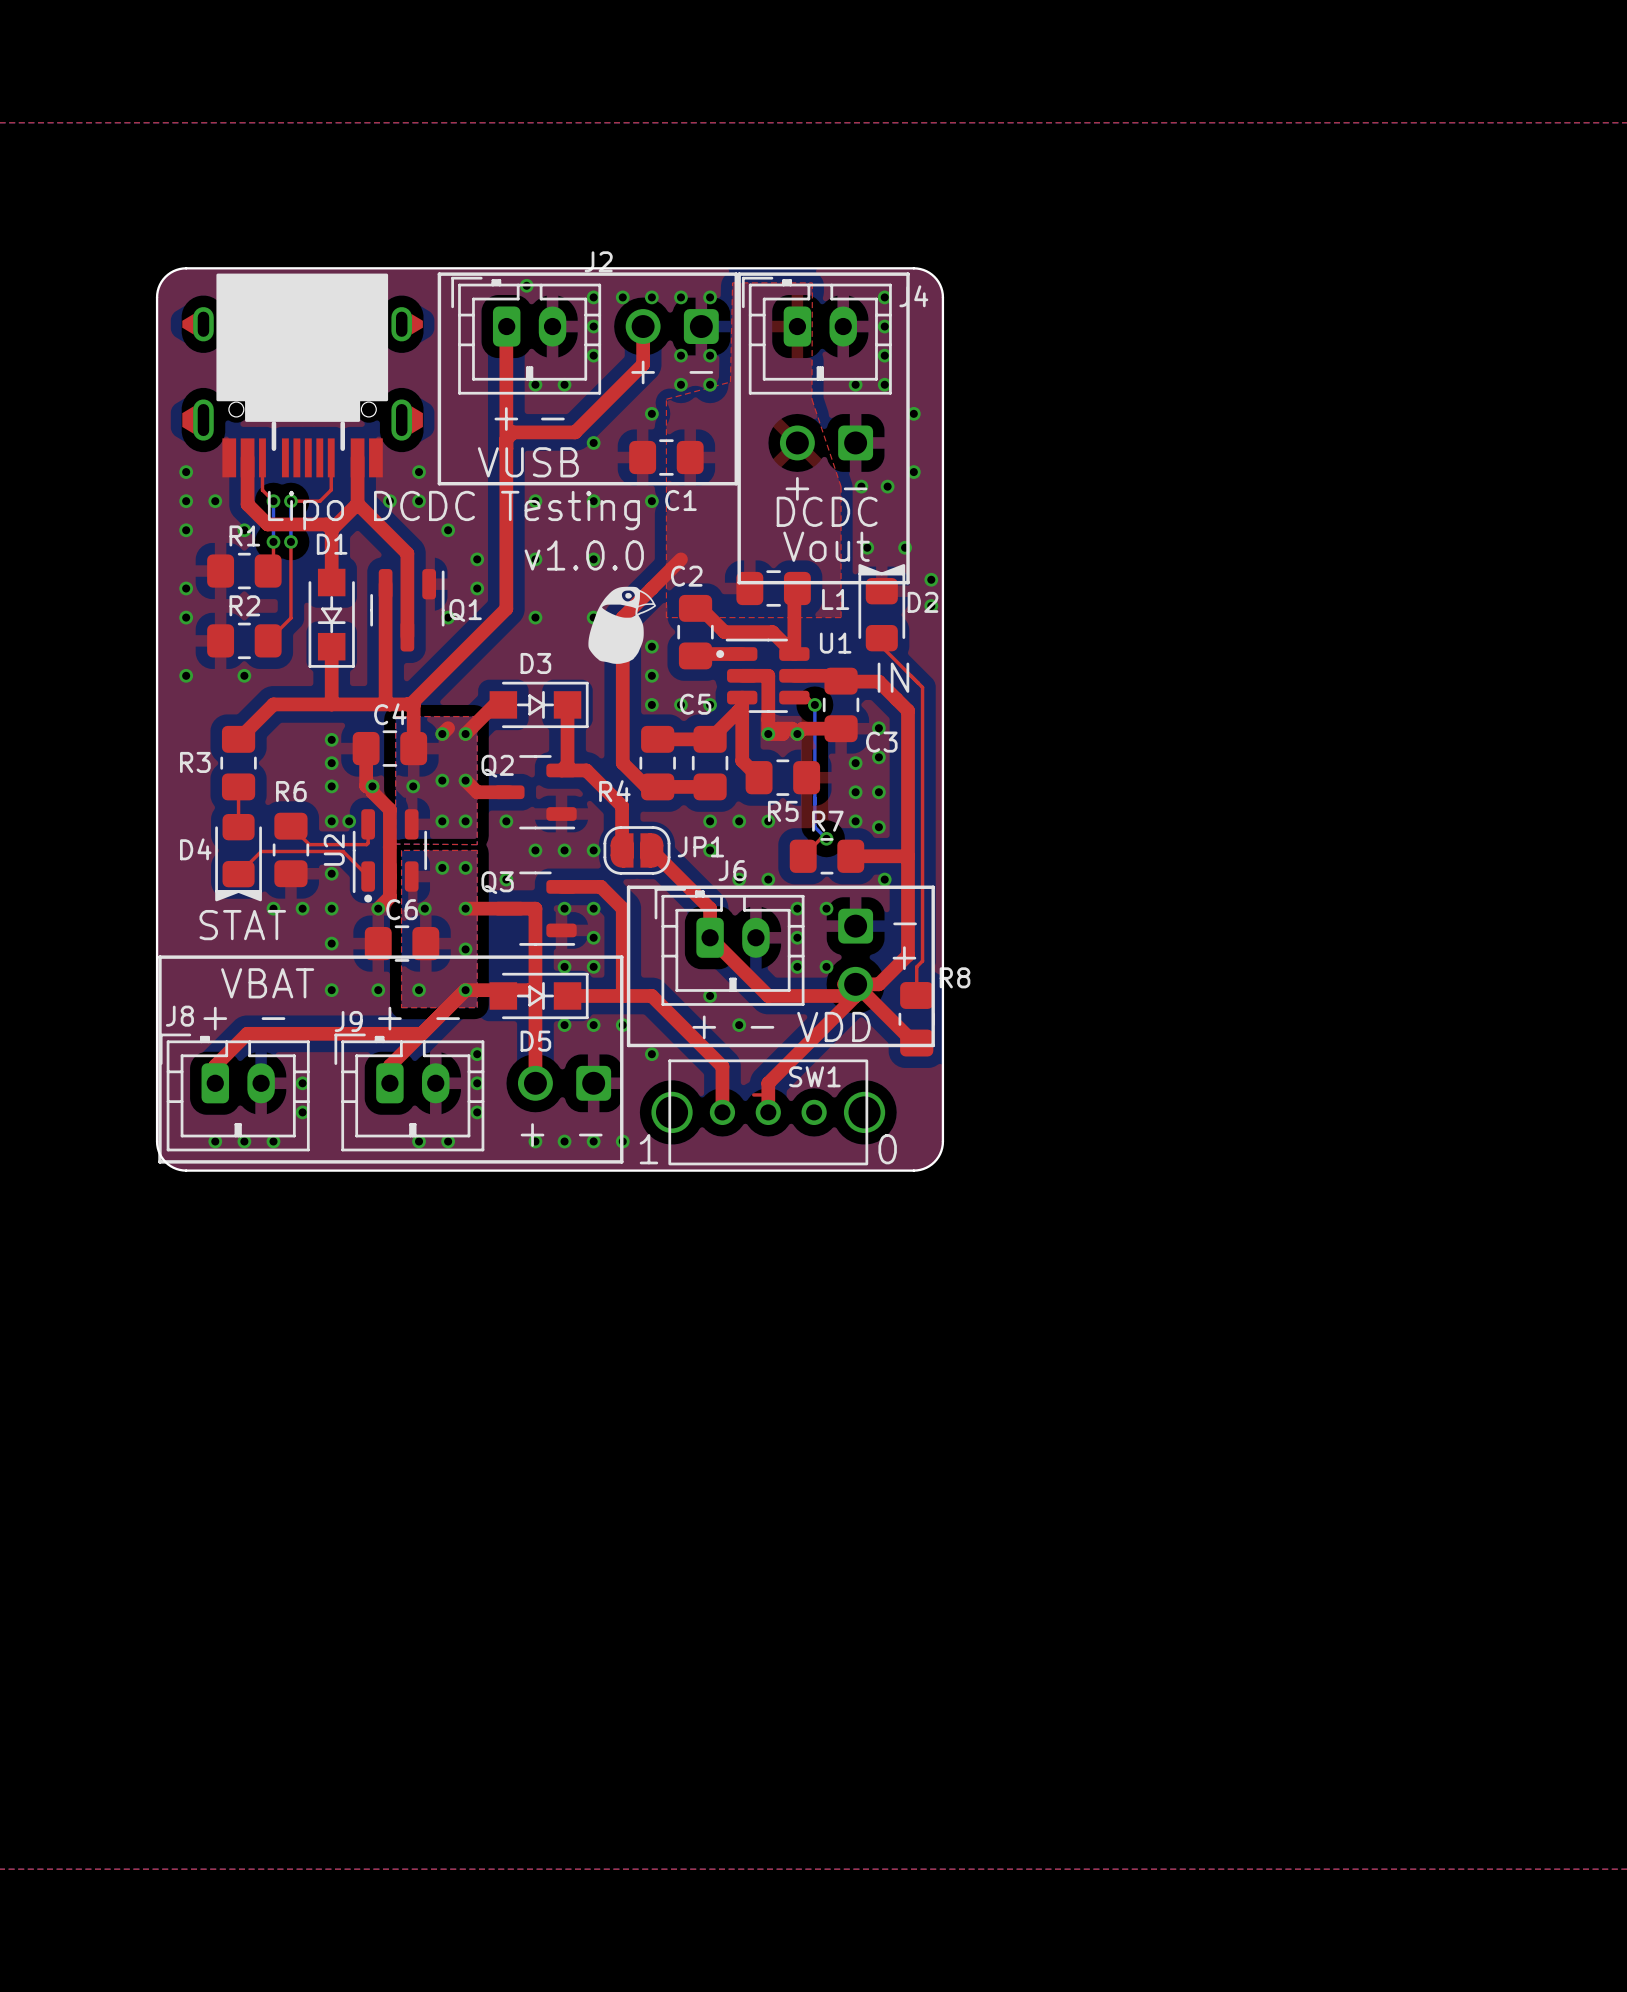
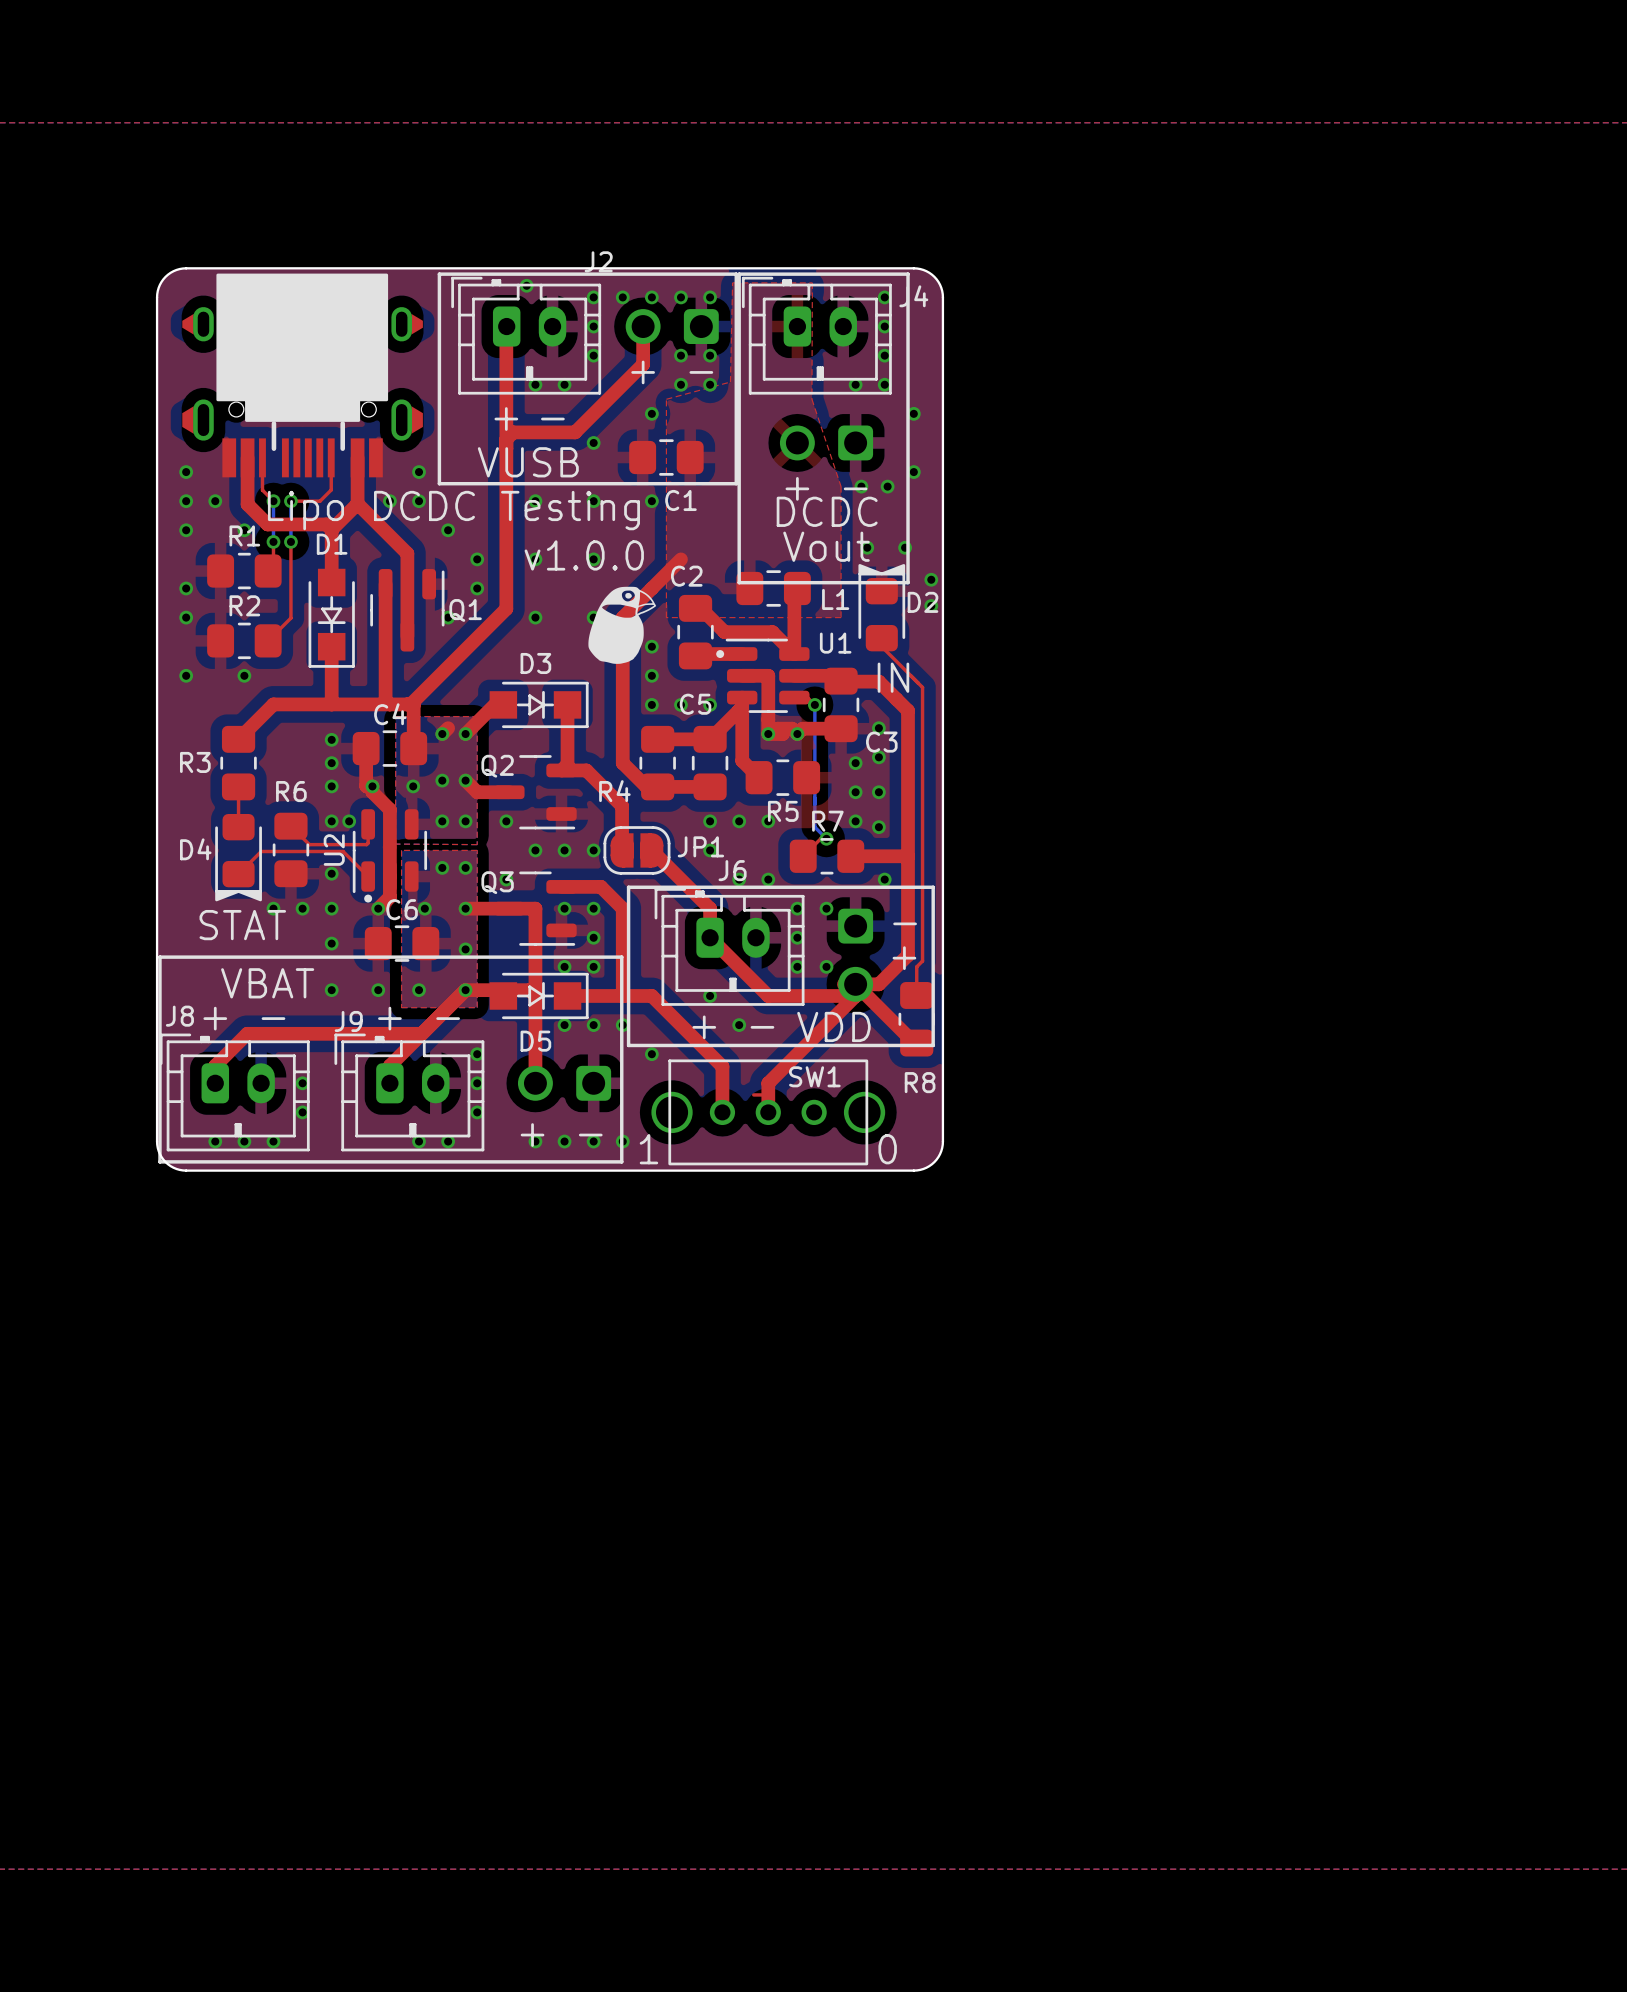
R8 name position: R8 (955, 977) -> R8 (920, 1082)

